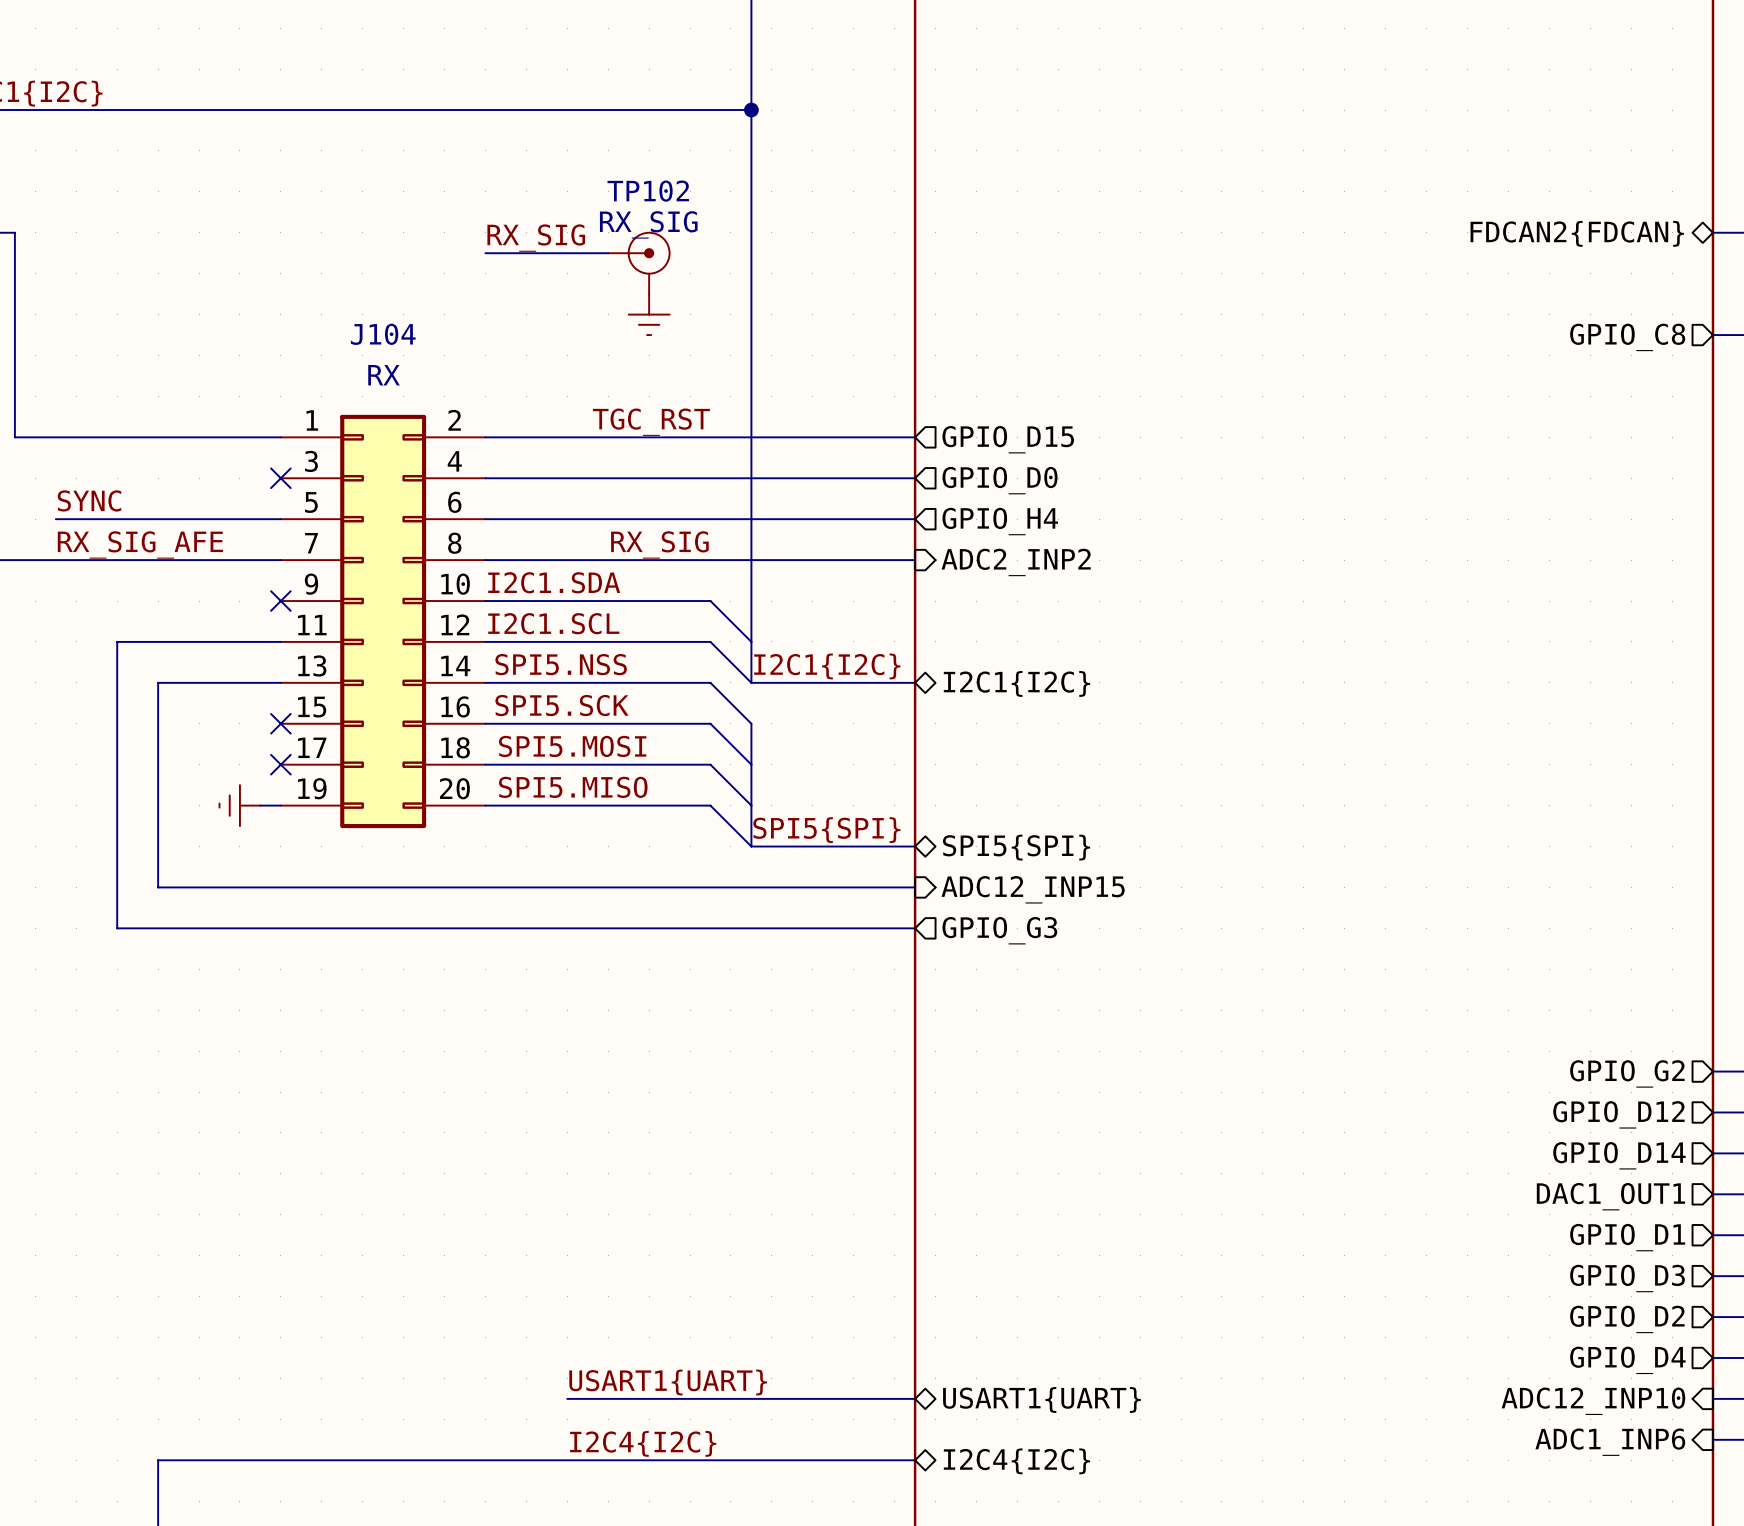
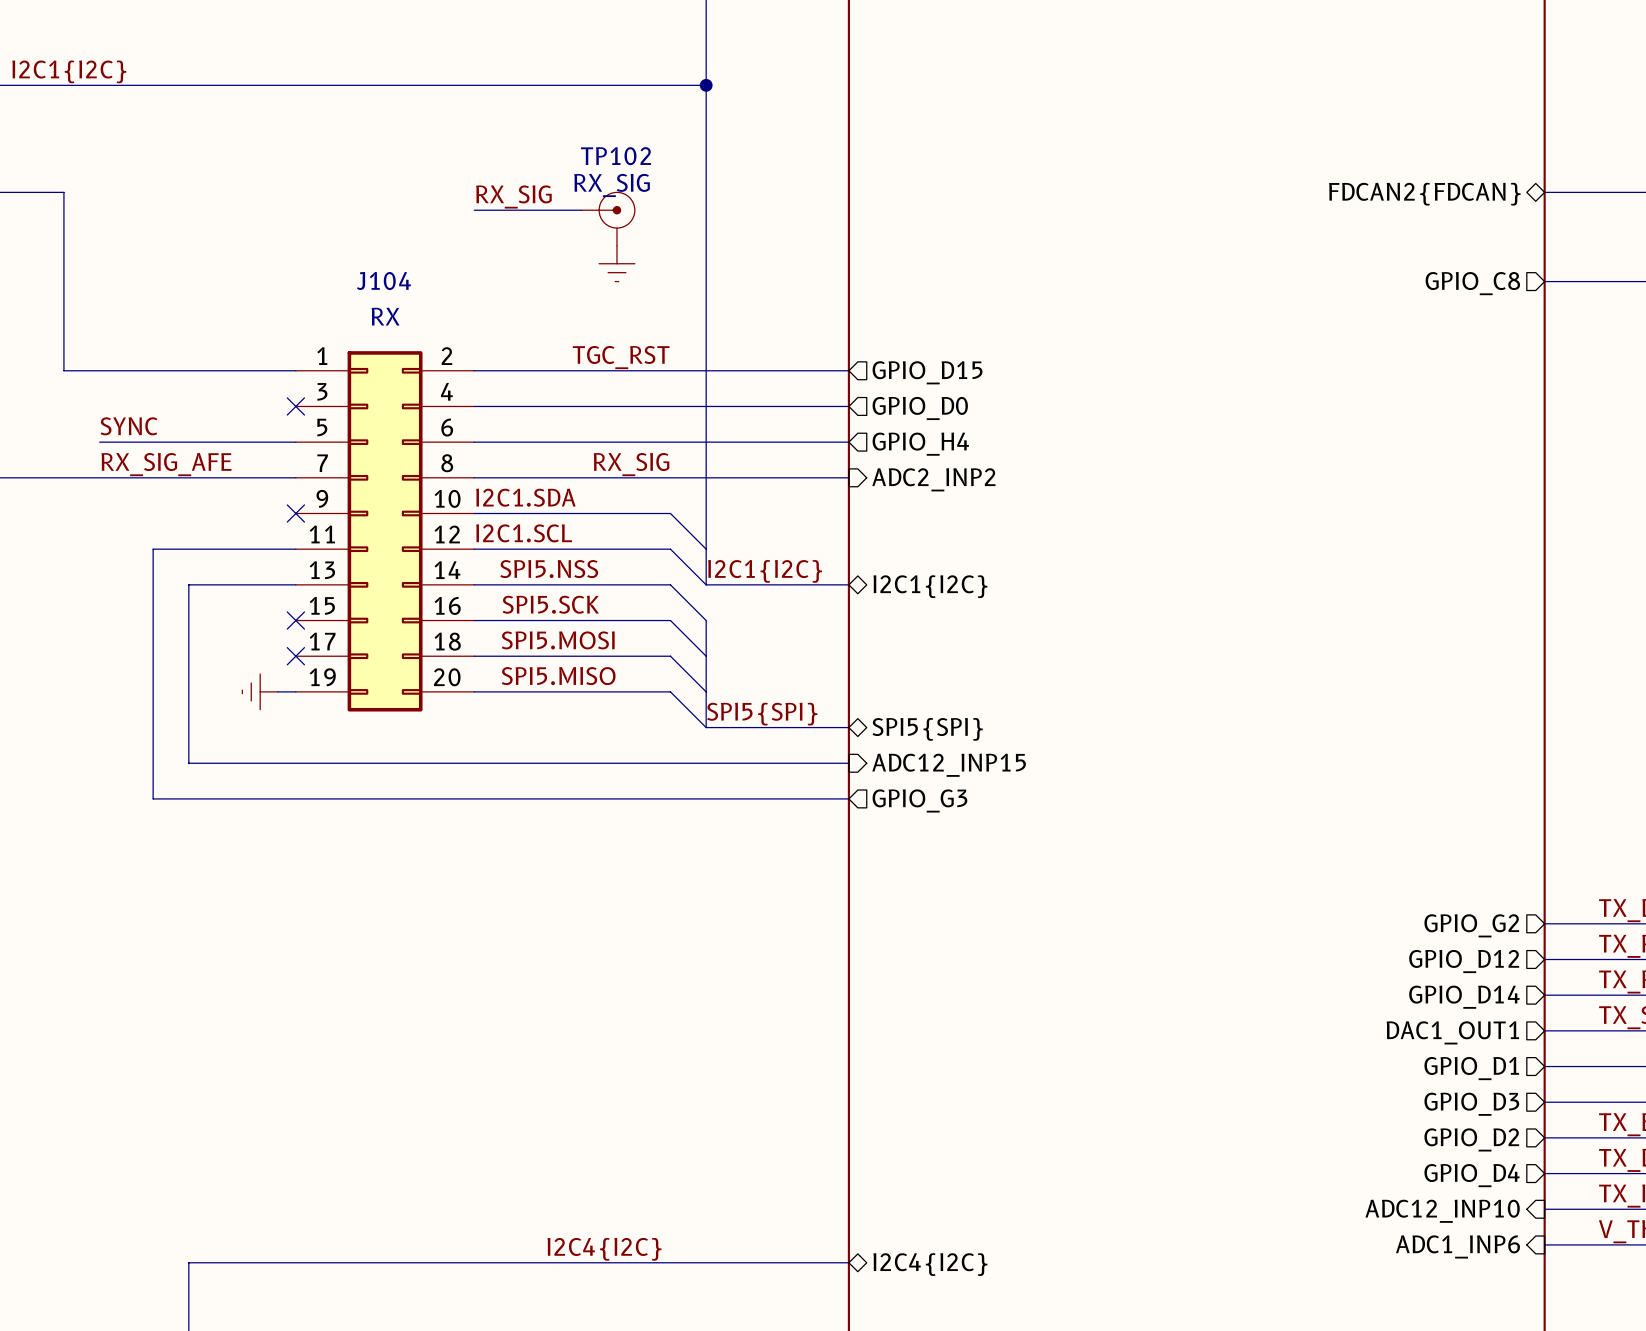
label: USART1{UART} (668, 1382) -> none
bus: (567, 1398) (915, 1398) -> none
sheet pin: USART1{UART} (1041, 1399) -> none

